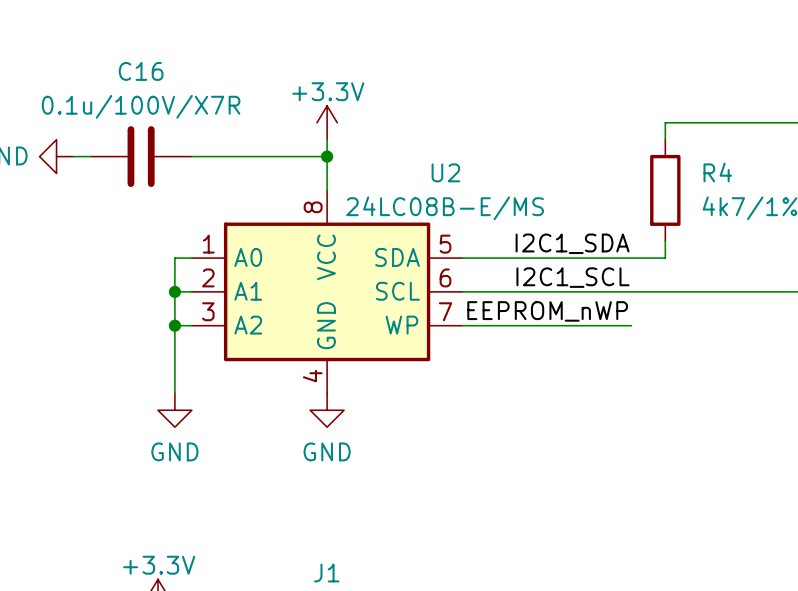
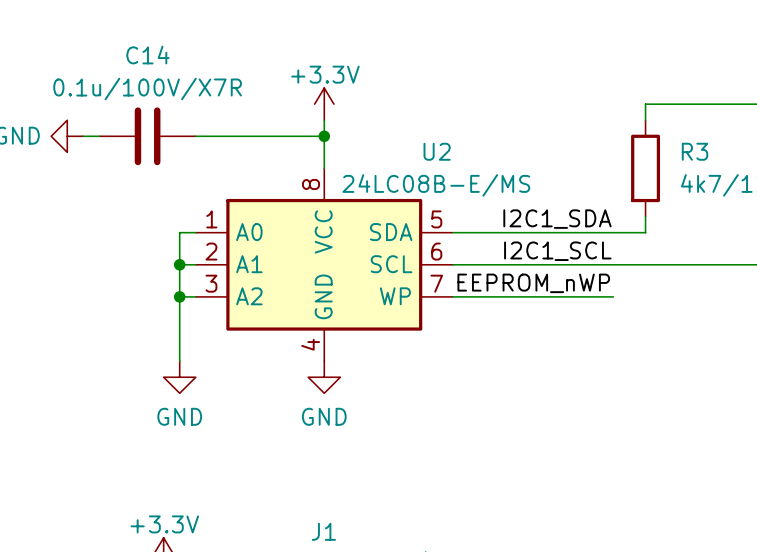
C16 name: C16 (141, 71) -> C14 (147, 54)
R4 name: R4 (717, 172) -> R3 (695, 151)

